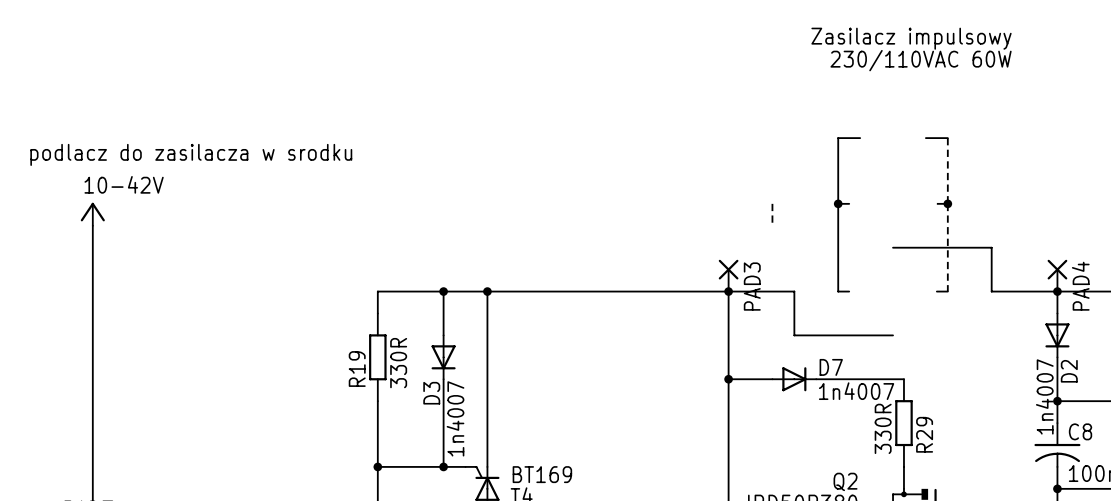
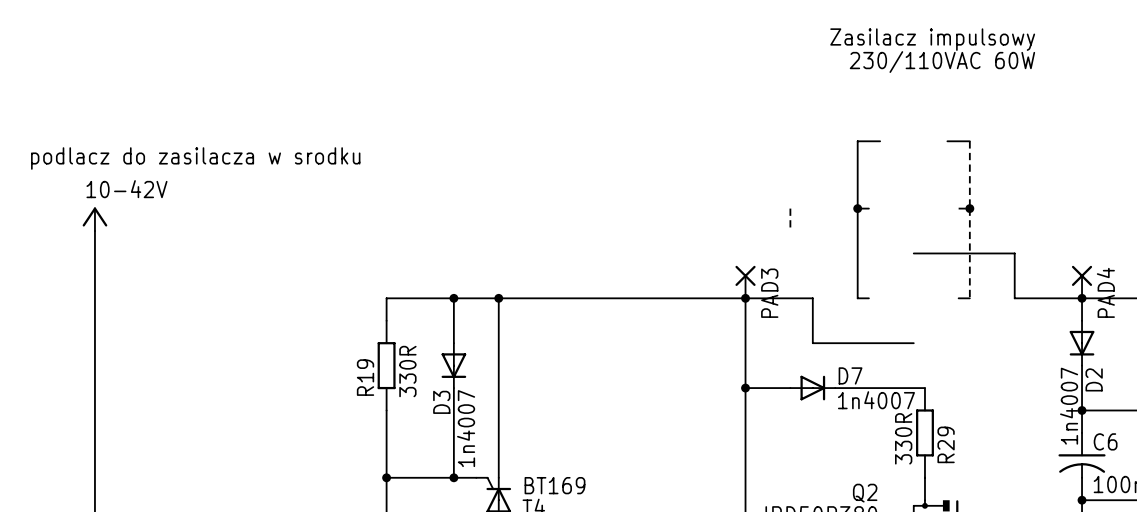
C8 name: C8 (1080, 431) -> C6 (1105, 441)

